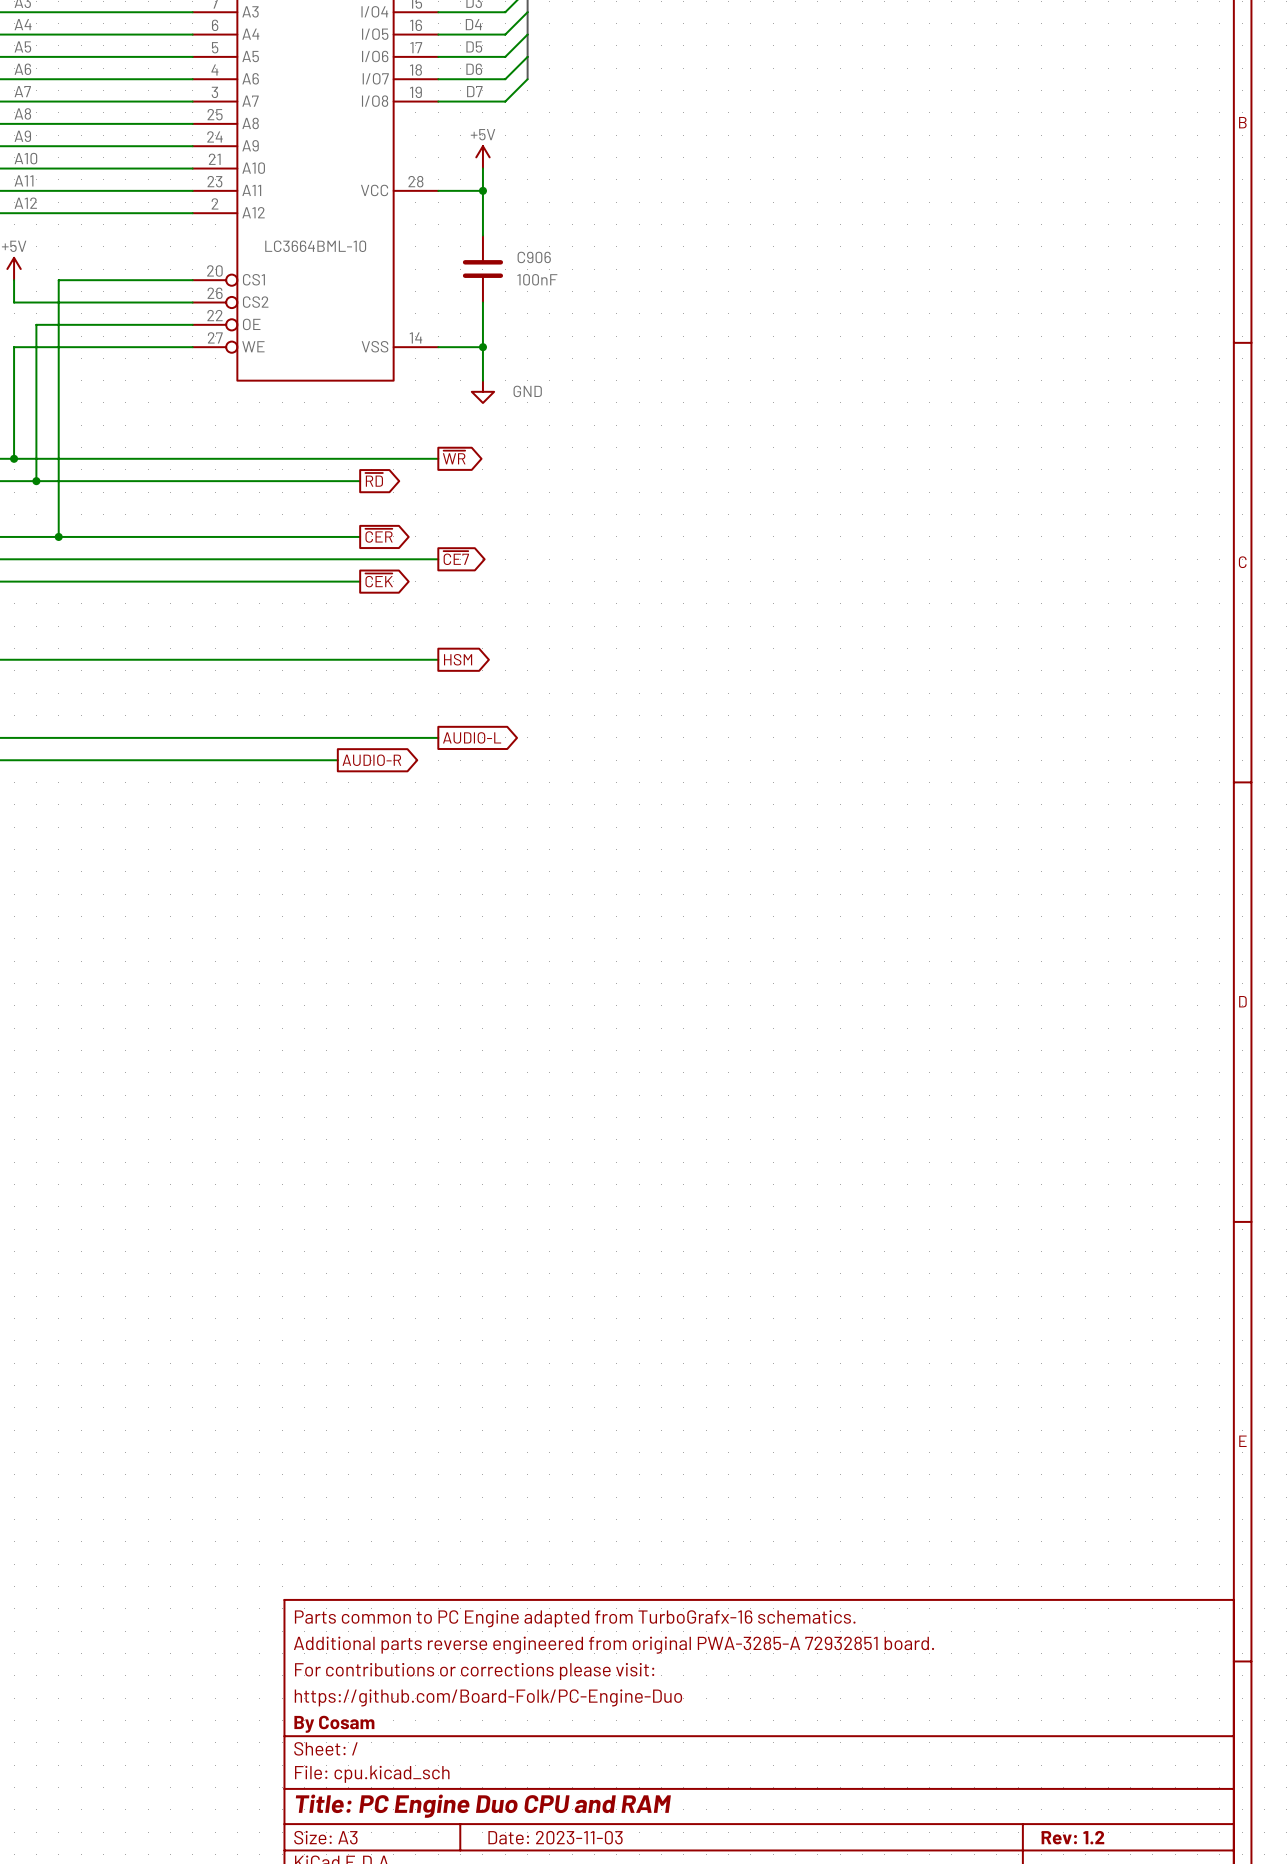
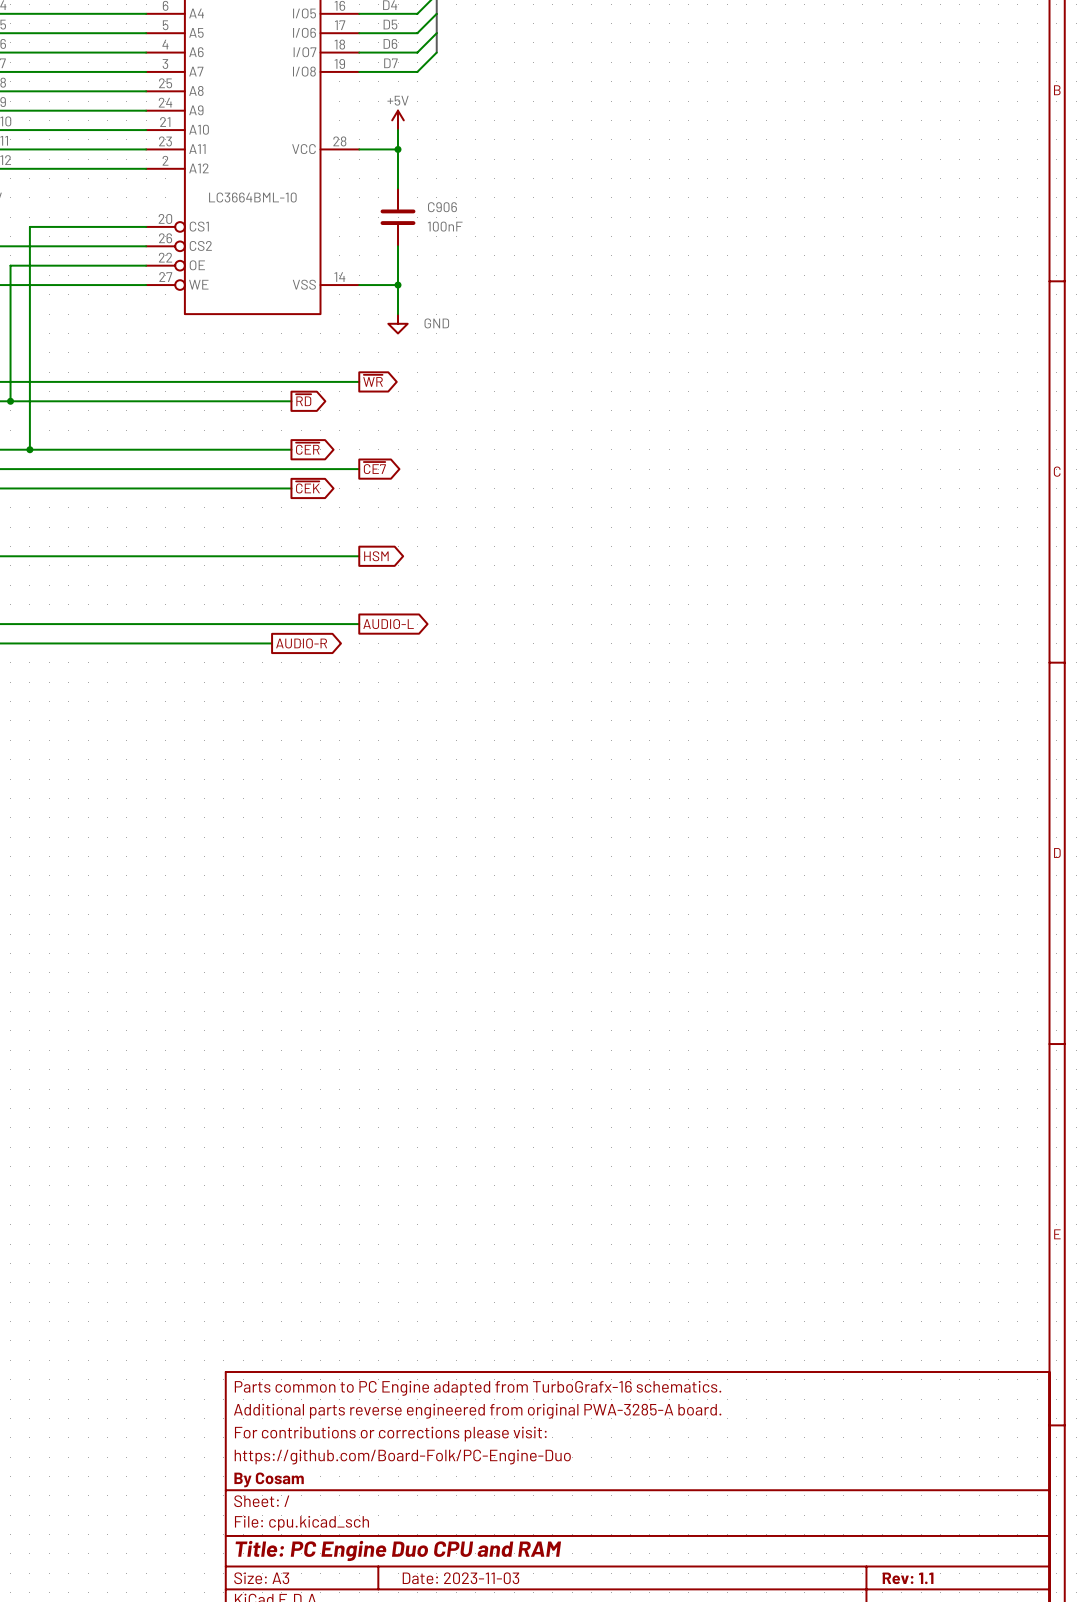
title block: Additional parts reverse engineered from original PWA-3285-A 72932851 board. (613, 1645) -> Additional parts reverse engineered from original PWA-3285-A board. (477, 1411)
title block: Rev: 1.2 (1072, 1837) -> Rev: 1.1 (908, 1578)

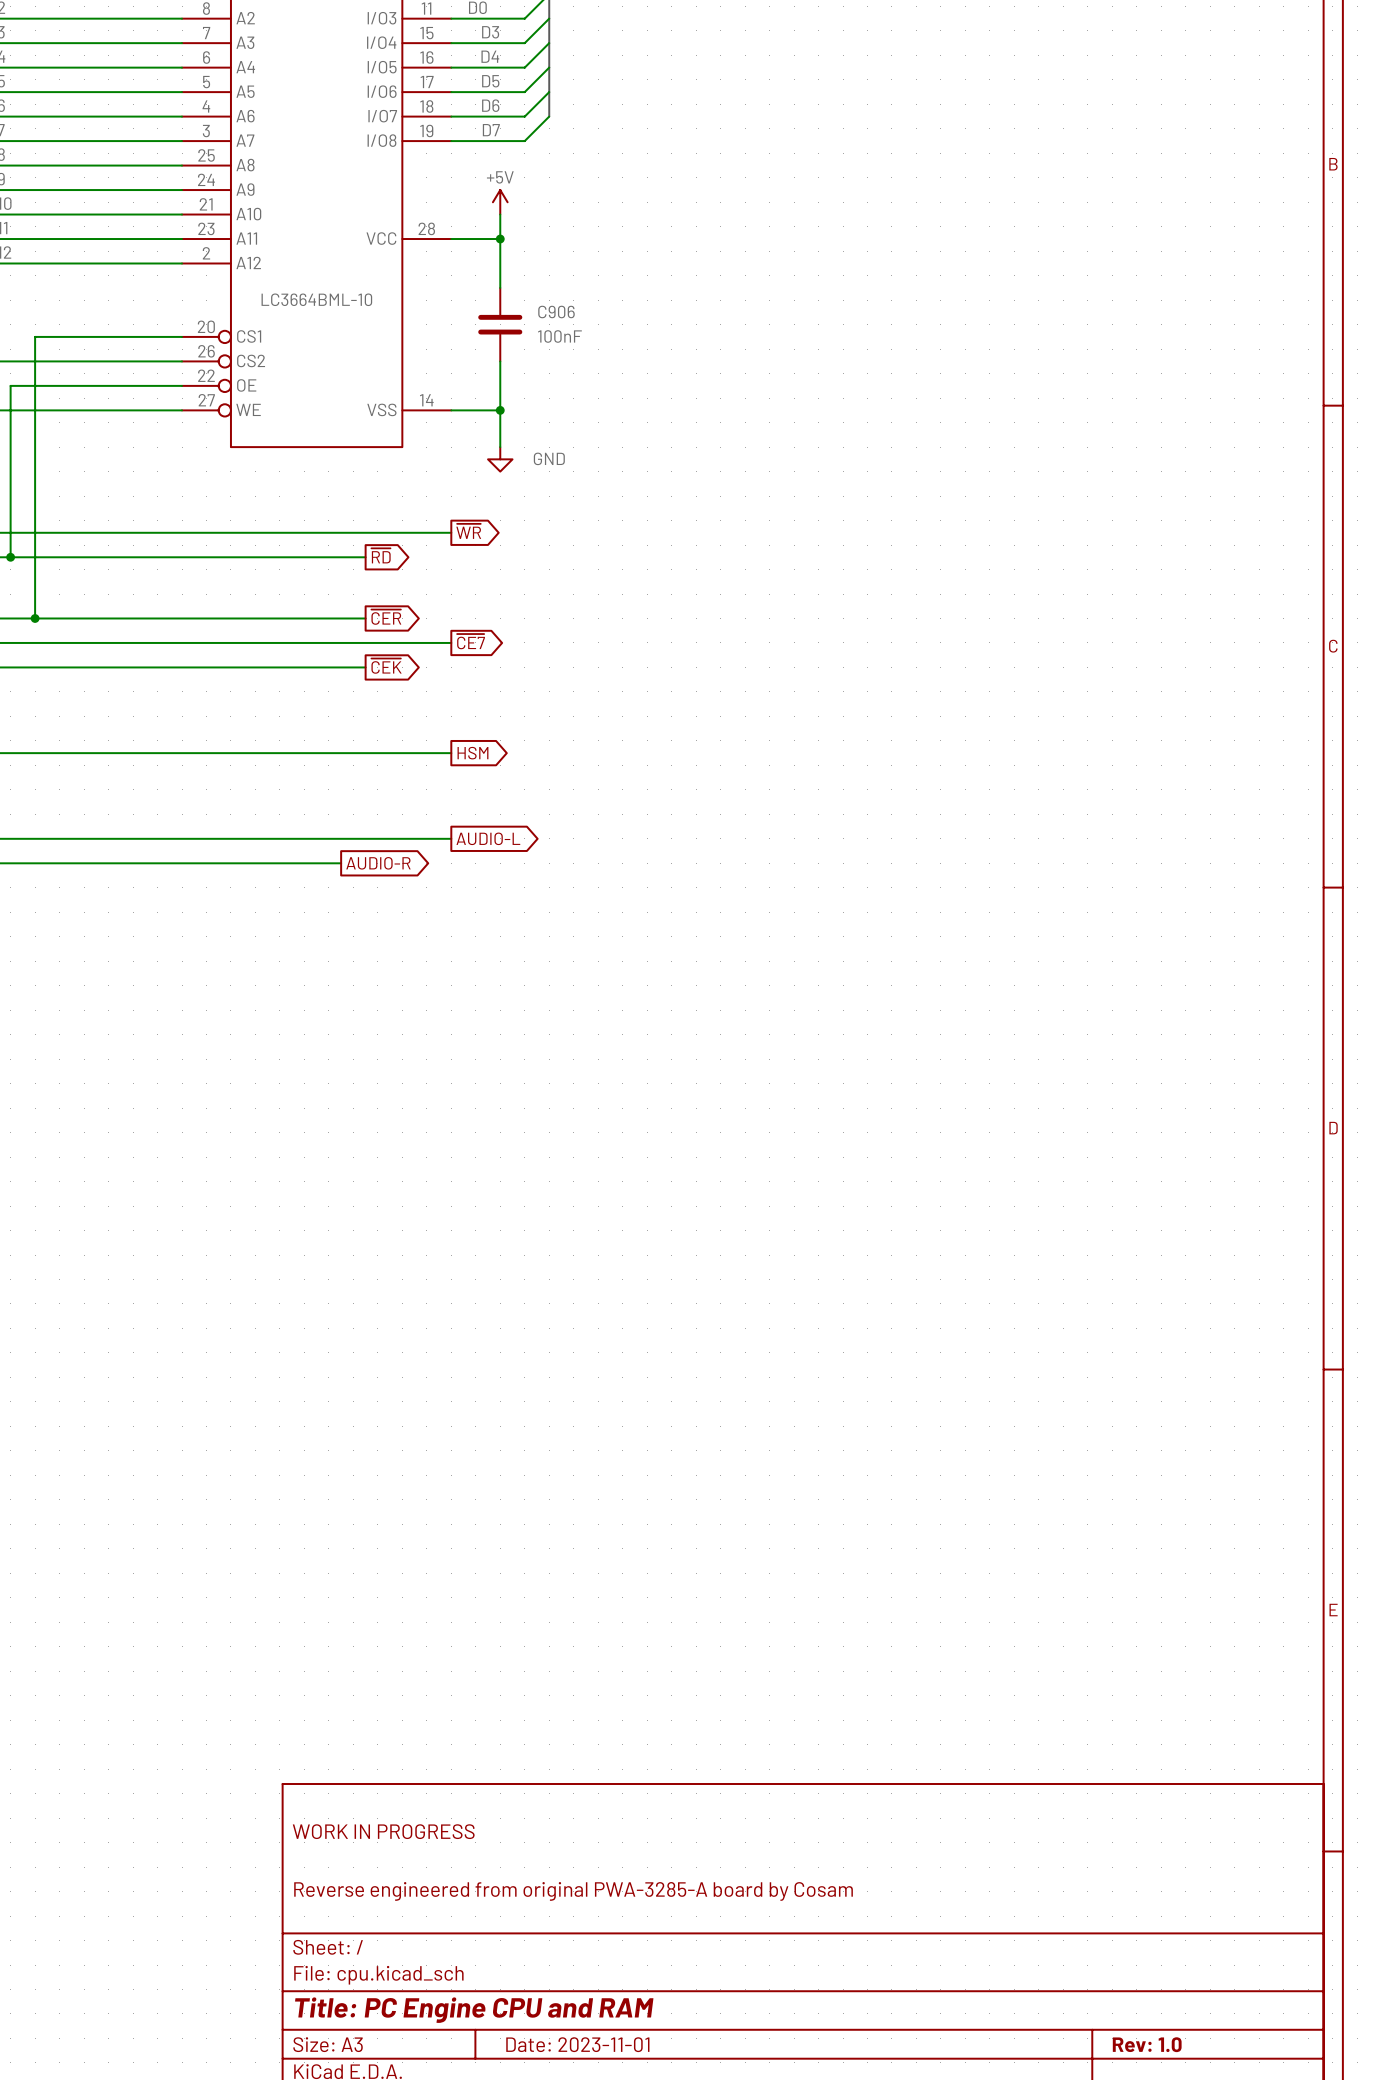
title block: Parts common to PC Engine adapted from TurboGrafx-16 schematics. (478, 1388) -> none
title block: Additional parts reverse engineered from original PWA-3285-A board. (477, 1411) -> WORK IN PROGRESS (383, 1831)
title block: For contributions or corrections please visit: (390, 1434) -> none
title block: https://github.com/Board-Folk/PC-Engine-Duo (402, 1457) -> Reverse engineered from original PWA-3285-A board by Cosam (573, 1891)
title block: By Cosam (269, 1479) -> none
title block: Title: PC Engine Duo CPU and RAM (398, 1550) -> Title: PC Engine CPU and RAM (474, 2010)
title block: Date: 2023-11-03 (460, 1578) -> Date: 2023-11-01 (577, 2044)
title block: Rev: 1.1 (908, 1578) -> Rev: 1.0 (1147, 2044)

